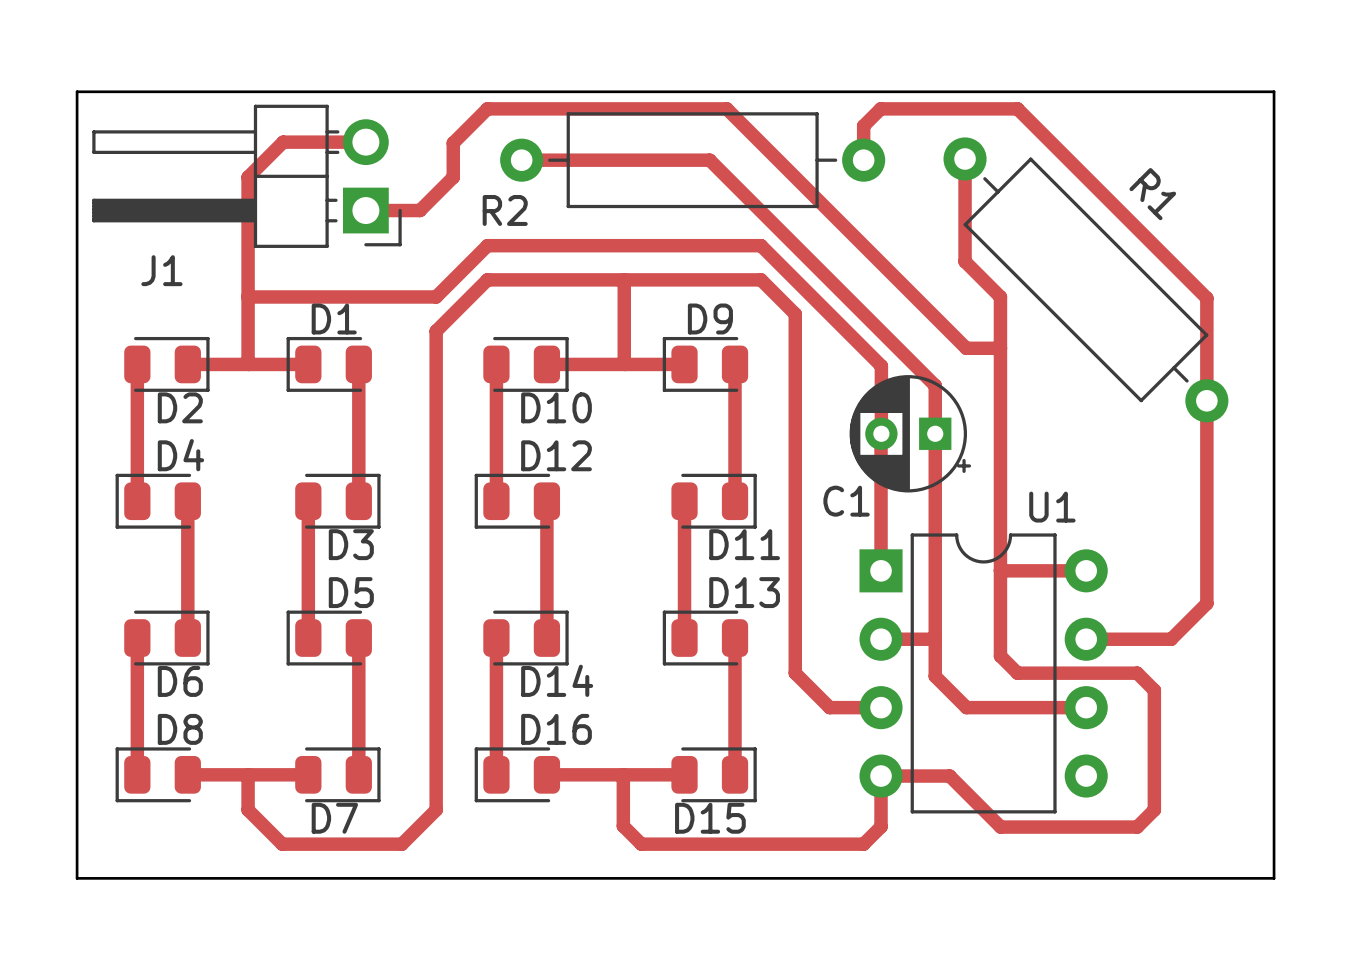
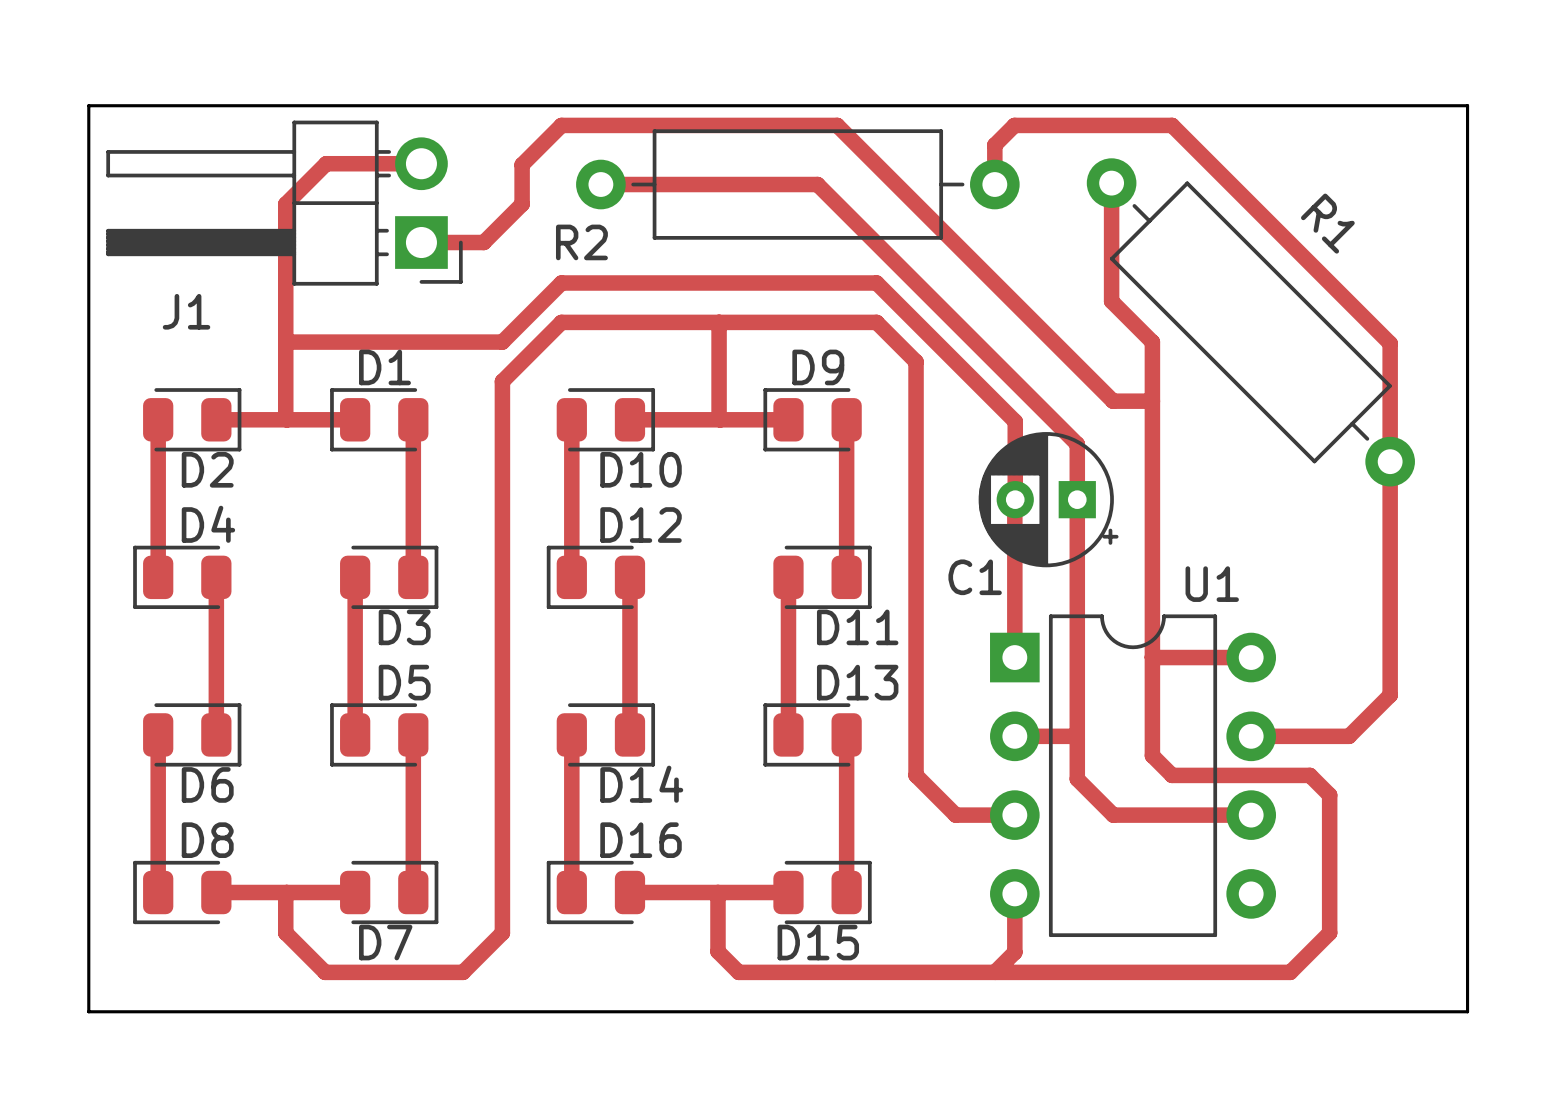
track: (881, 776) (949, 776) (1000, 827) (1137, 827) -> (994, 972) (1290, 972) (1309, 952)

